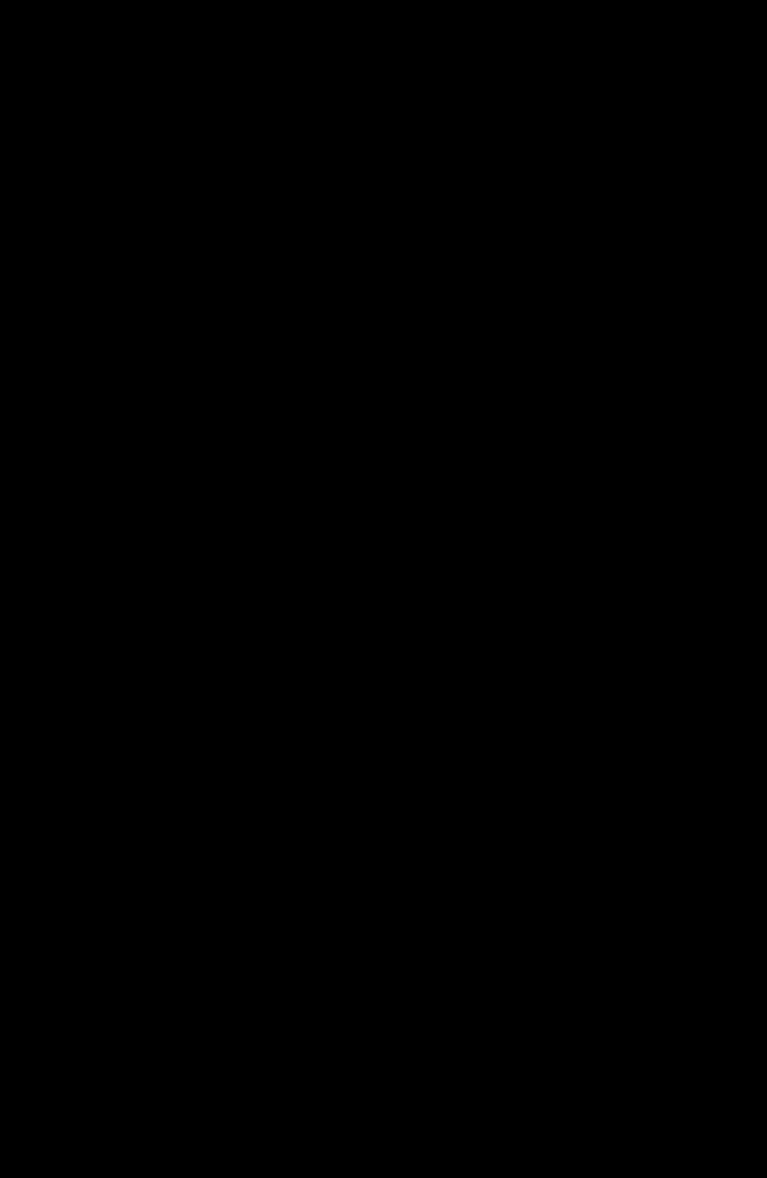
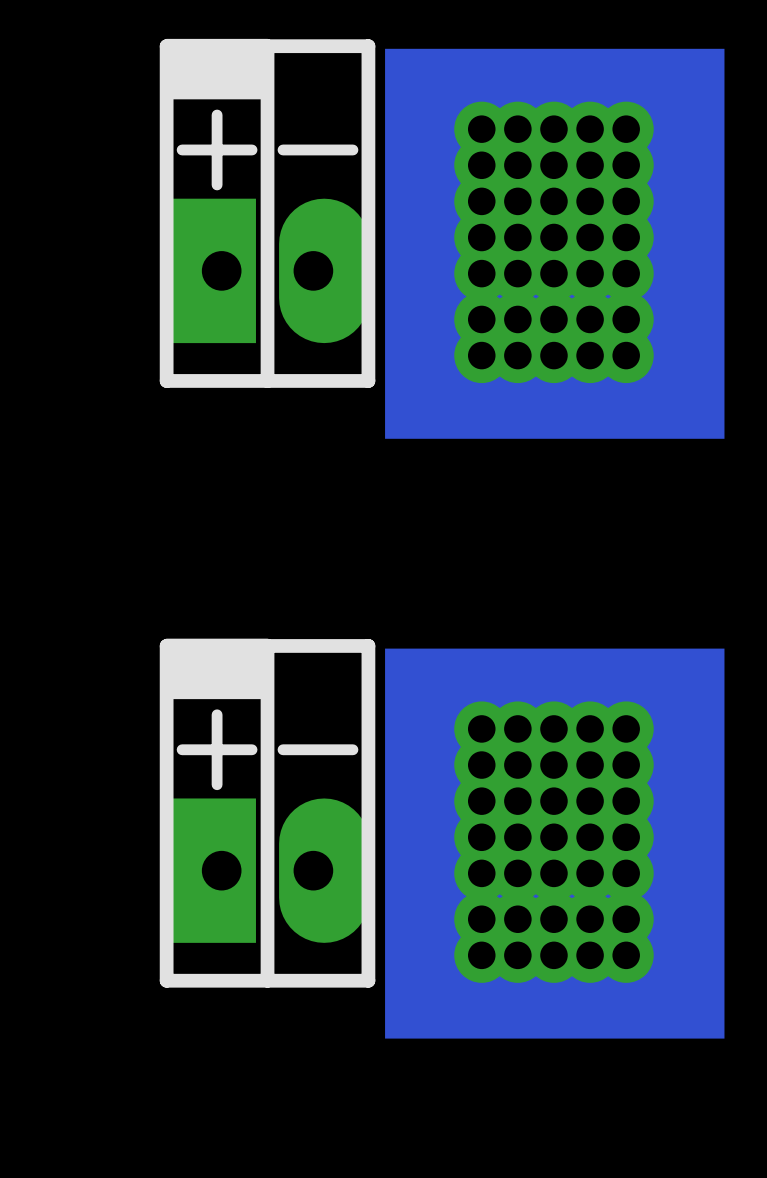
part: none -> (267, 213)
part: none -> (554, 243)
part: none -> (267, 813)
part: none -> (554, 843)

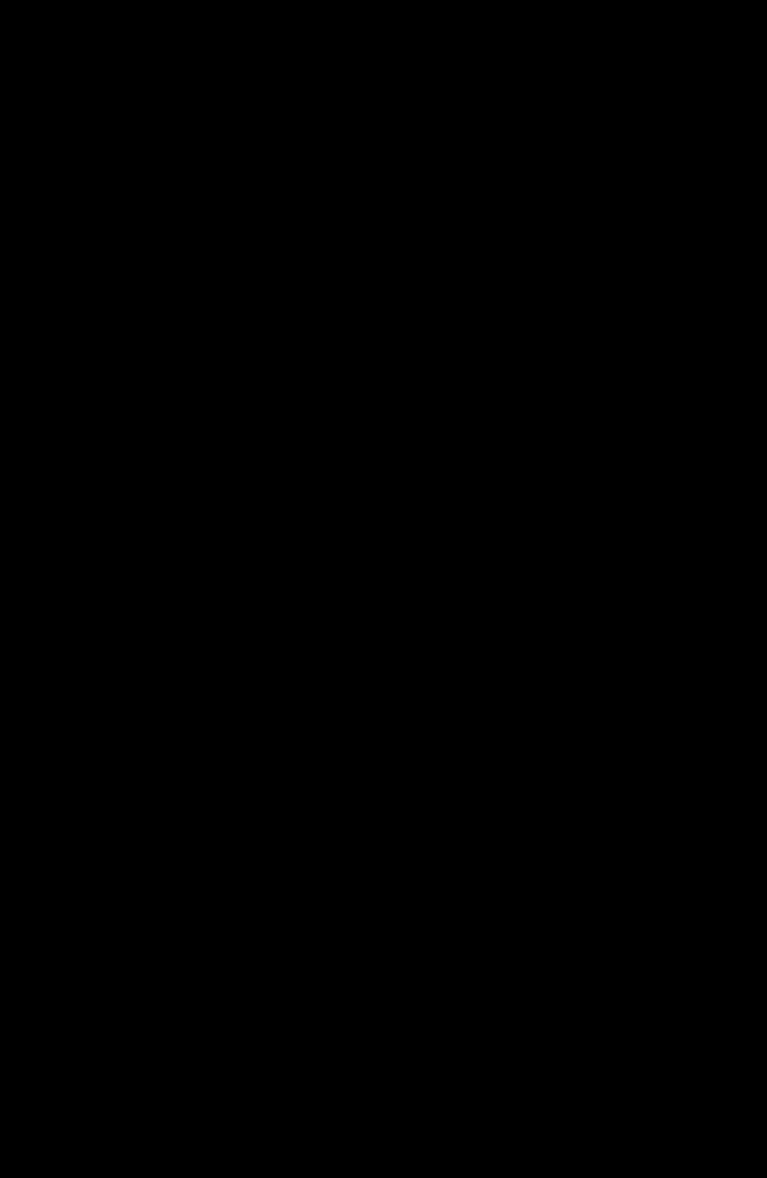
part: (267, 213) -> none
part: (554, 243) -> none
part: (267, 813) -> none
part: (554, 843) -> none

